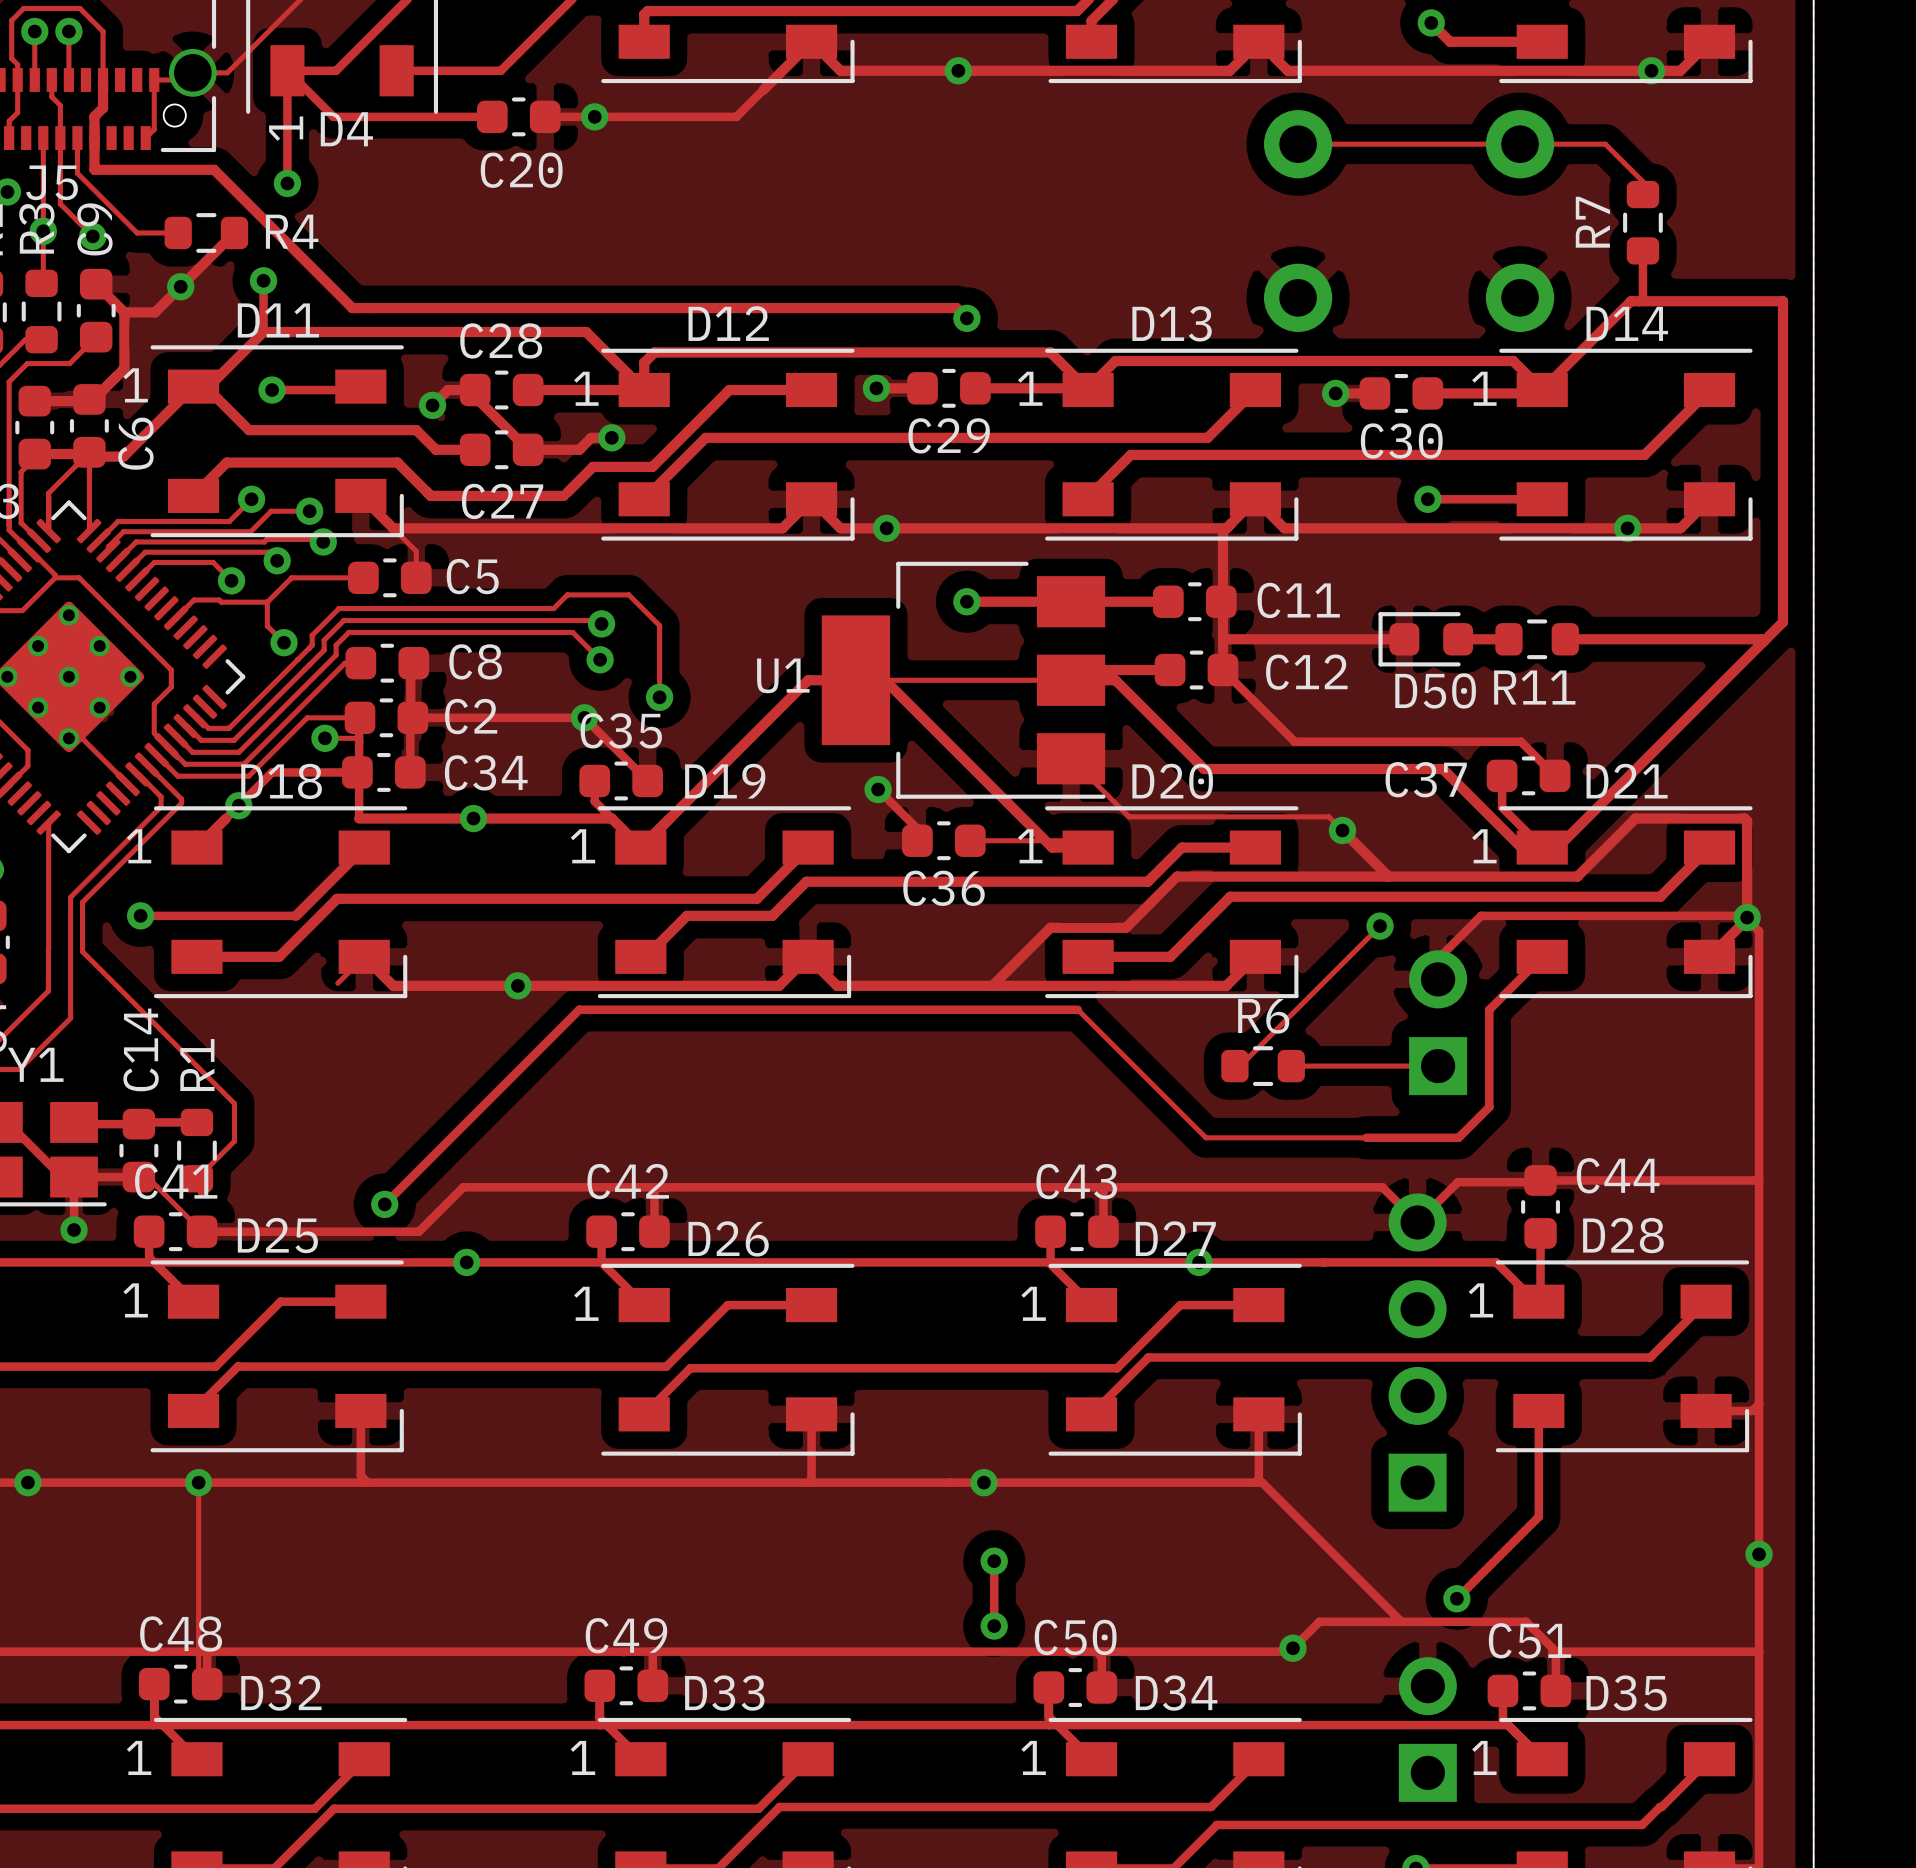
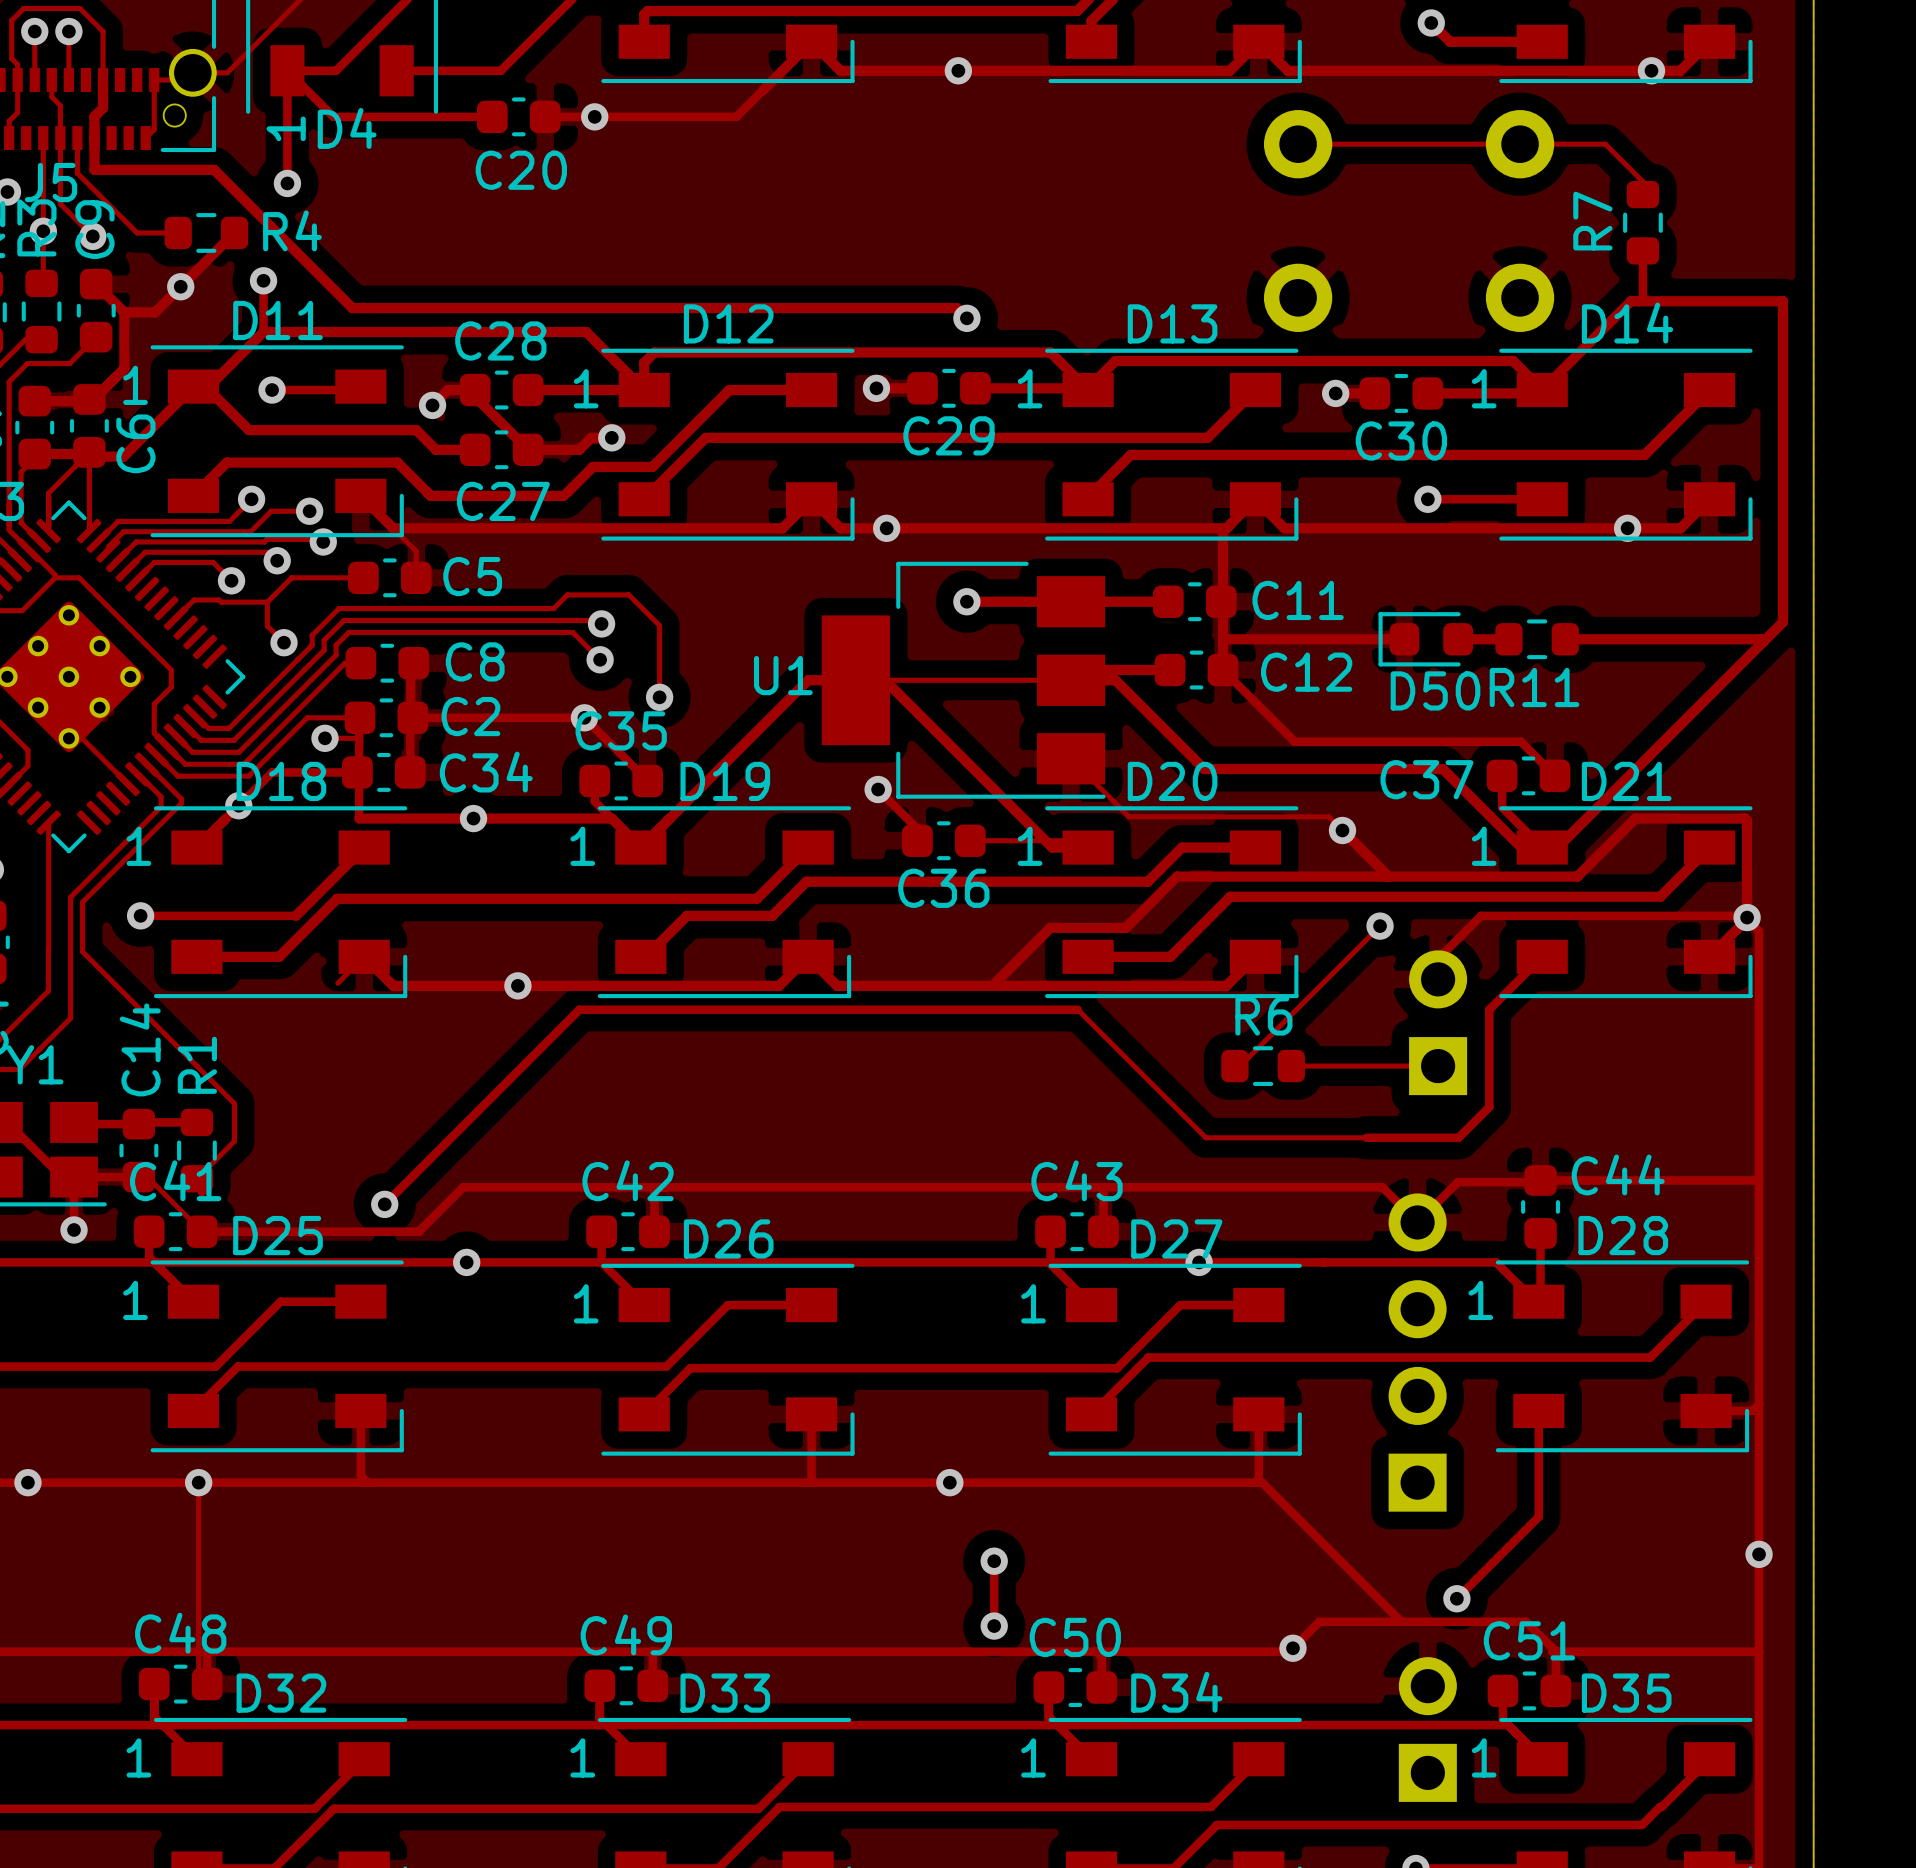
via position: (983, 1482) -> (949, 1482)

